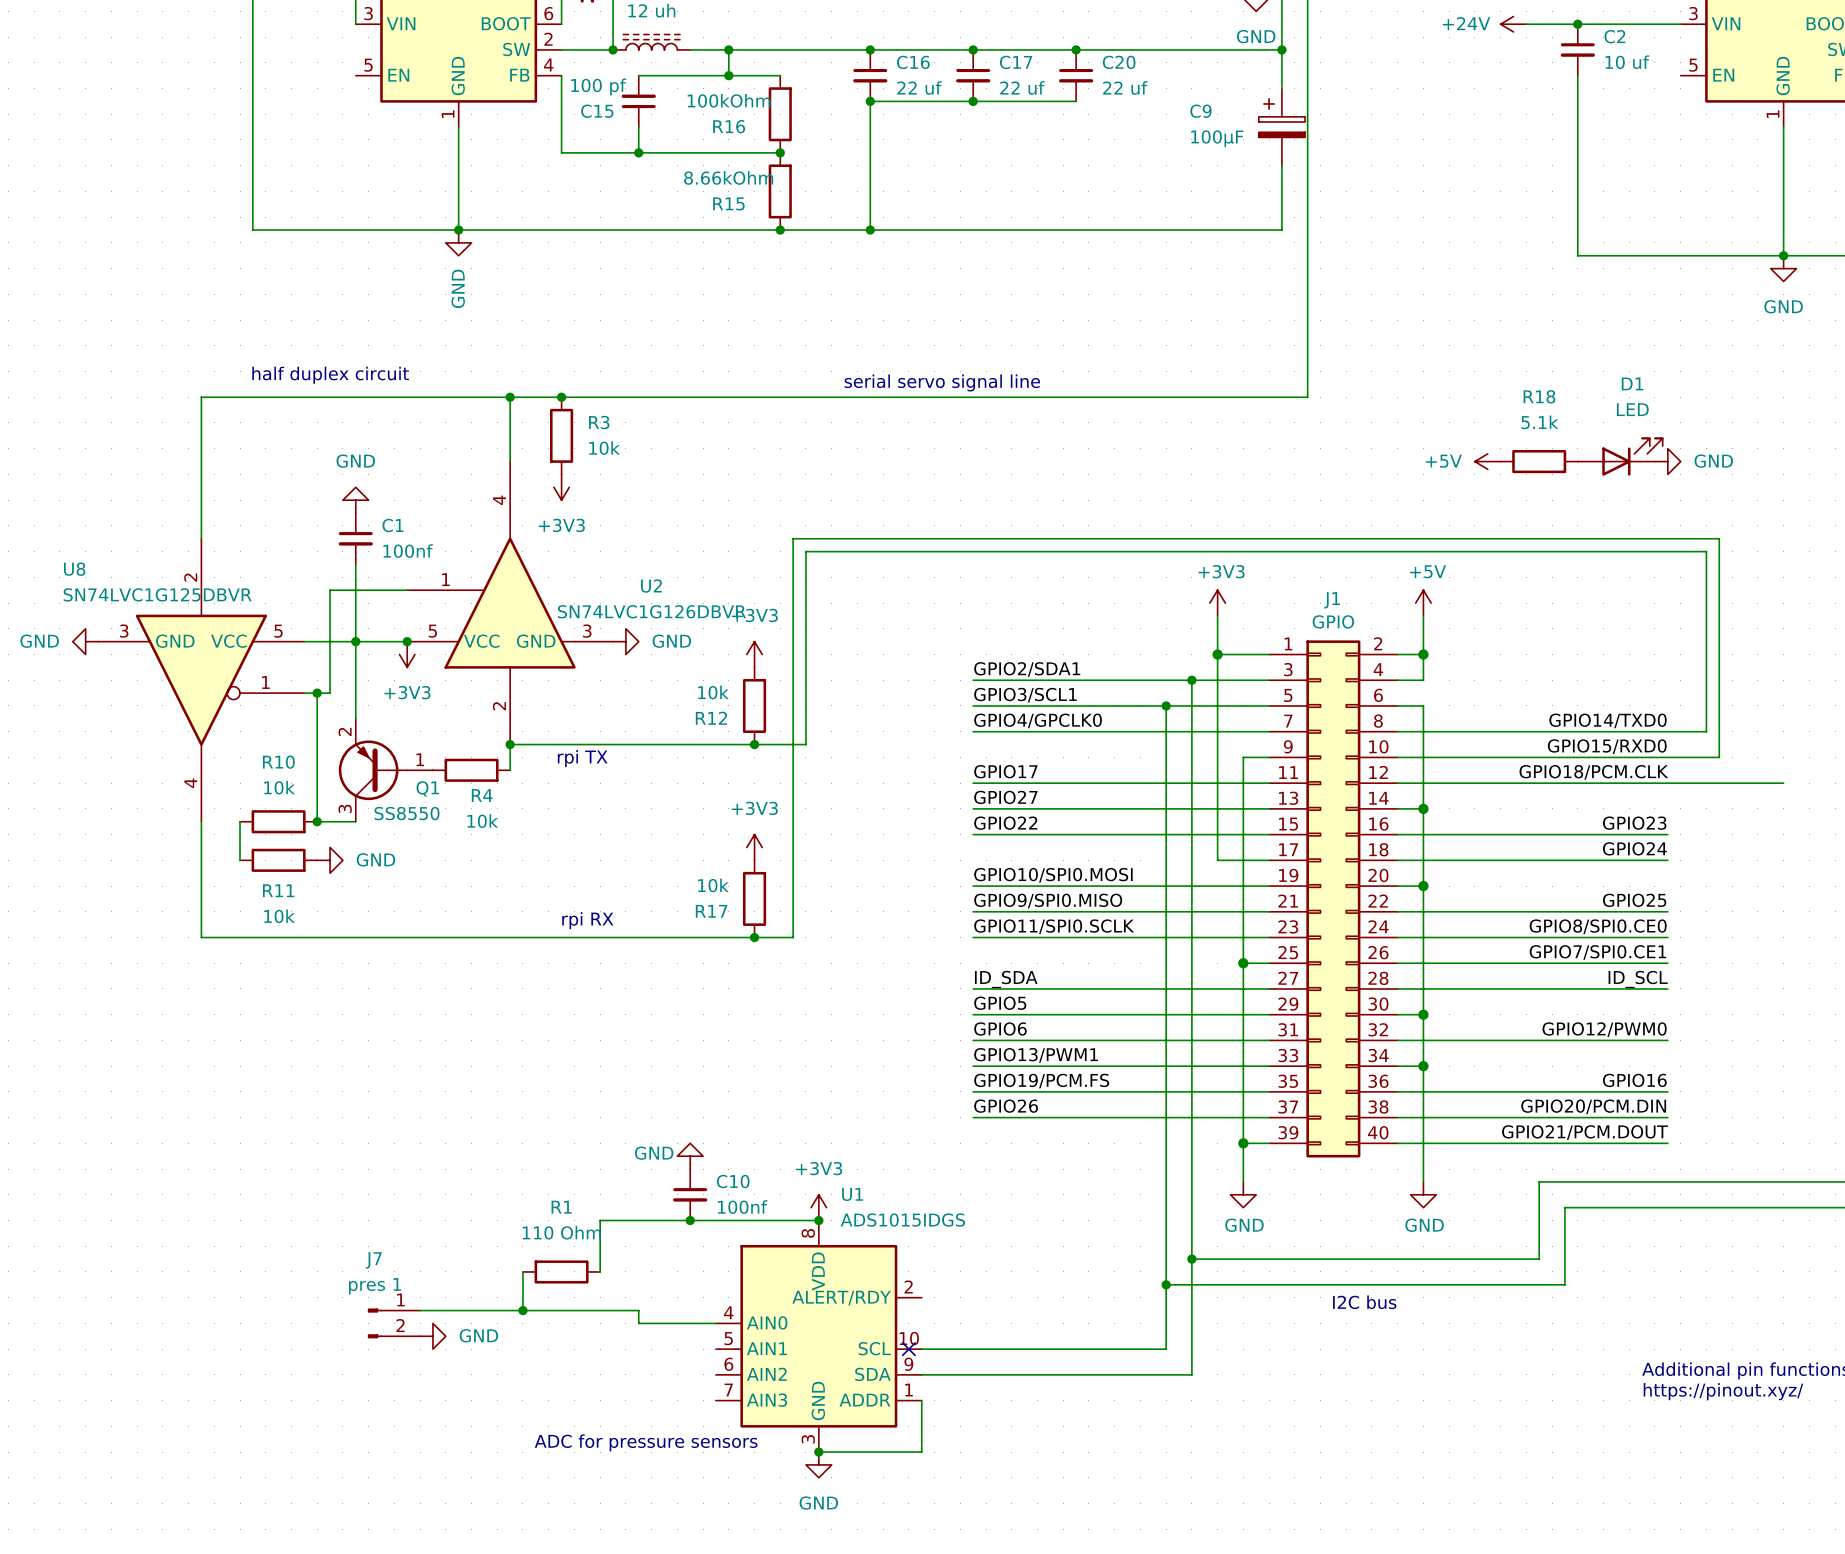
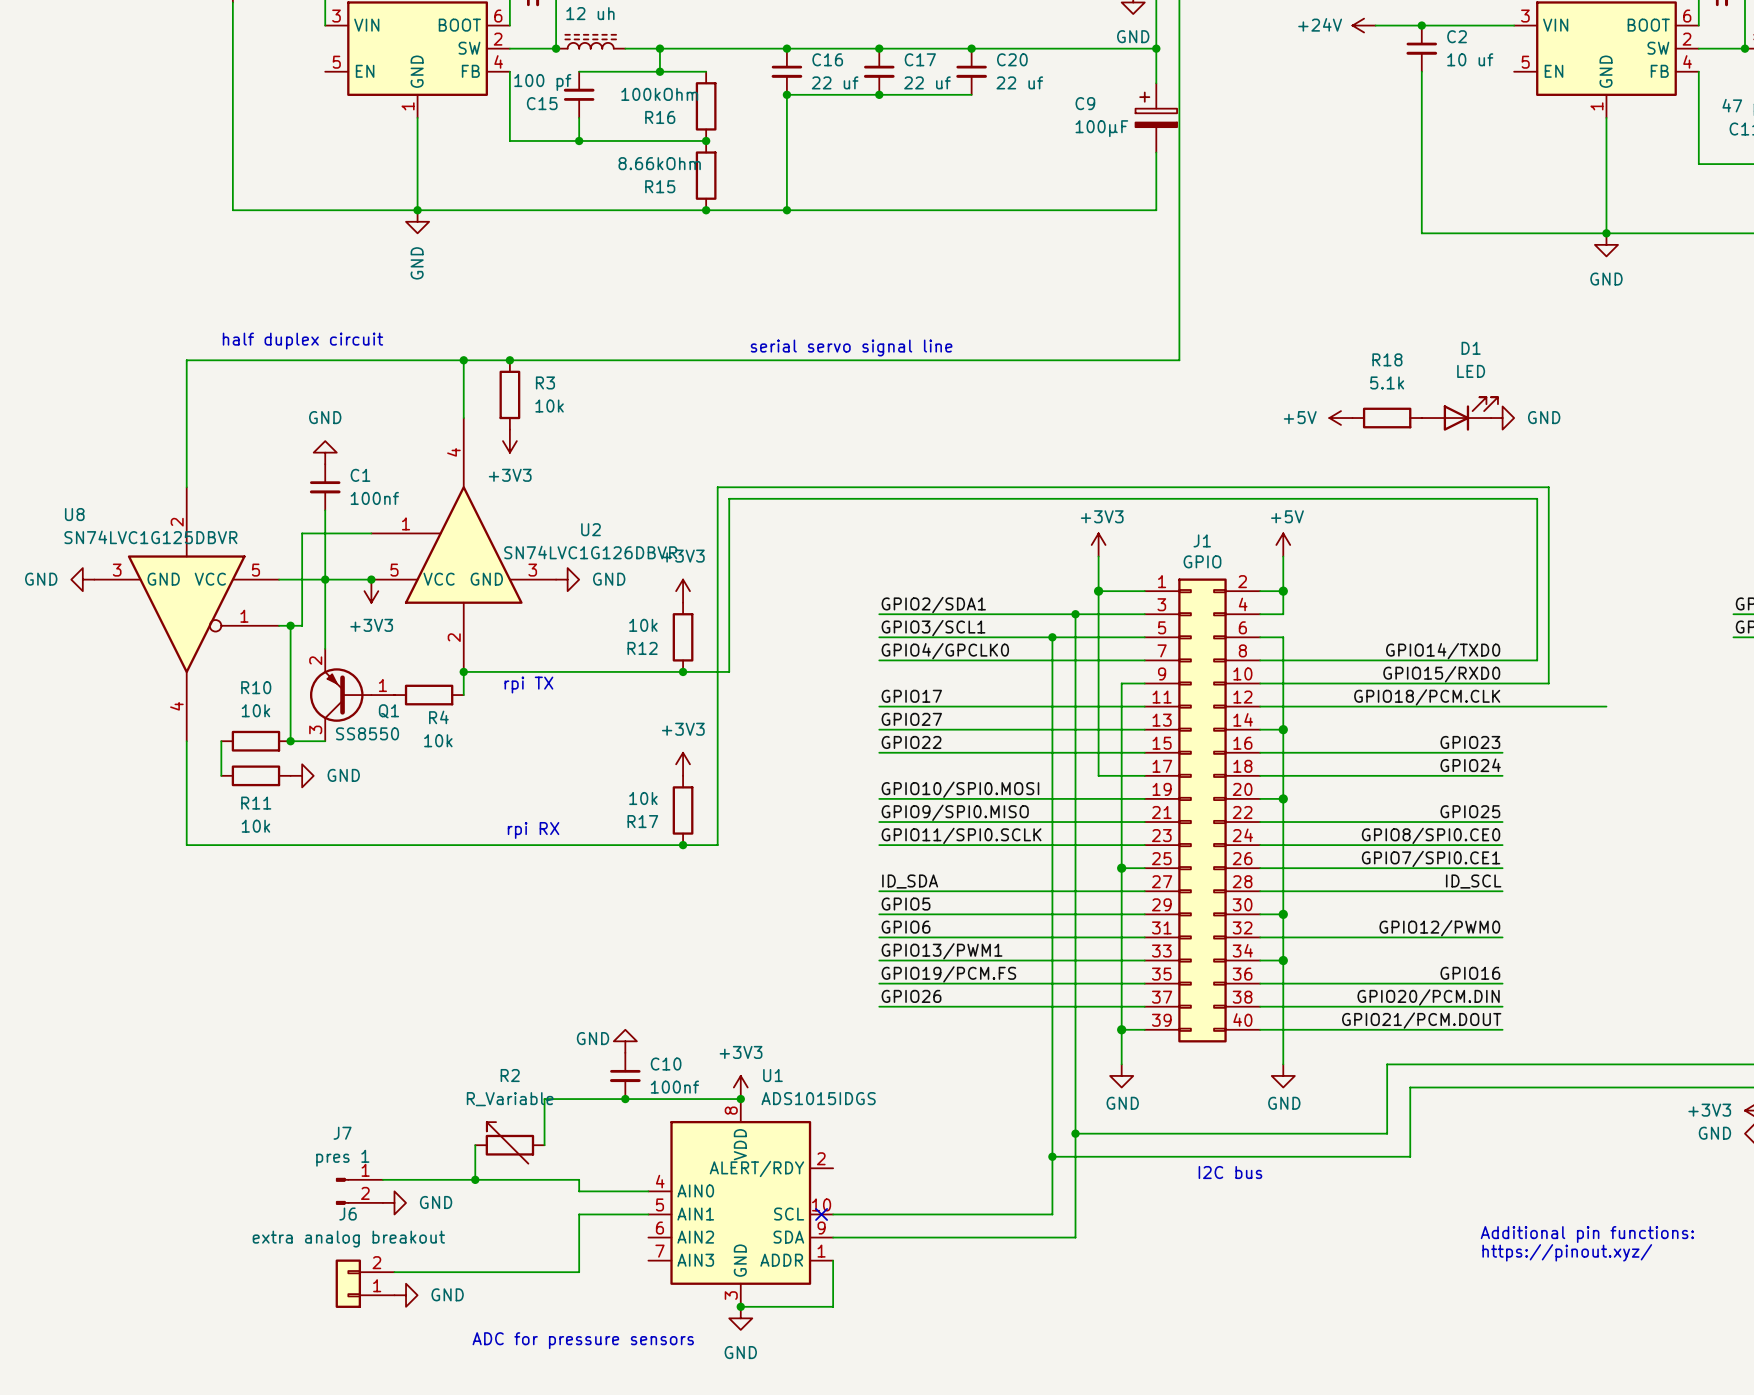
R2: none -> R_Variable (509, 1142)
R1: 110 Ohm (561, 1271) -> none
wire: none -> (648, 1214) (579, 1214) (579, 1272) (394, 1272)
J6: none -> extra analog breakout (365, 1283)
power symbol: none -> GND (406, 1295)
text position: ADC for pressure sensors (646, 1442) -> ADC for pressure sensors (583, 1340)

